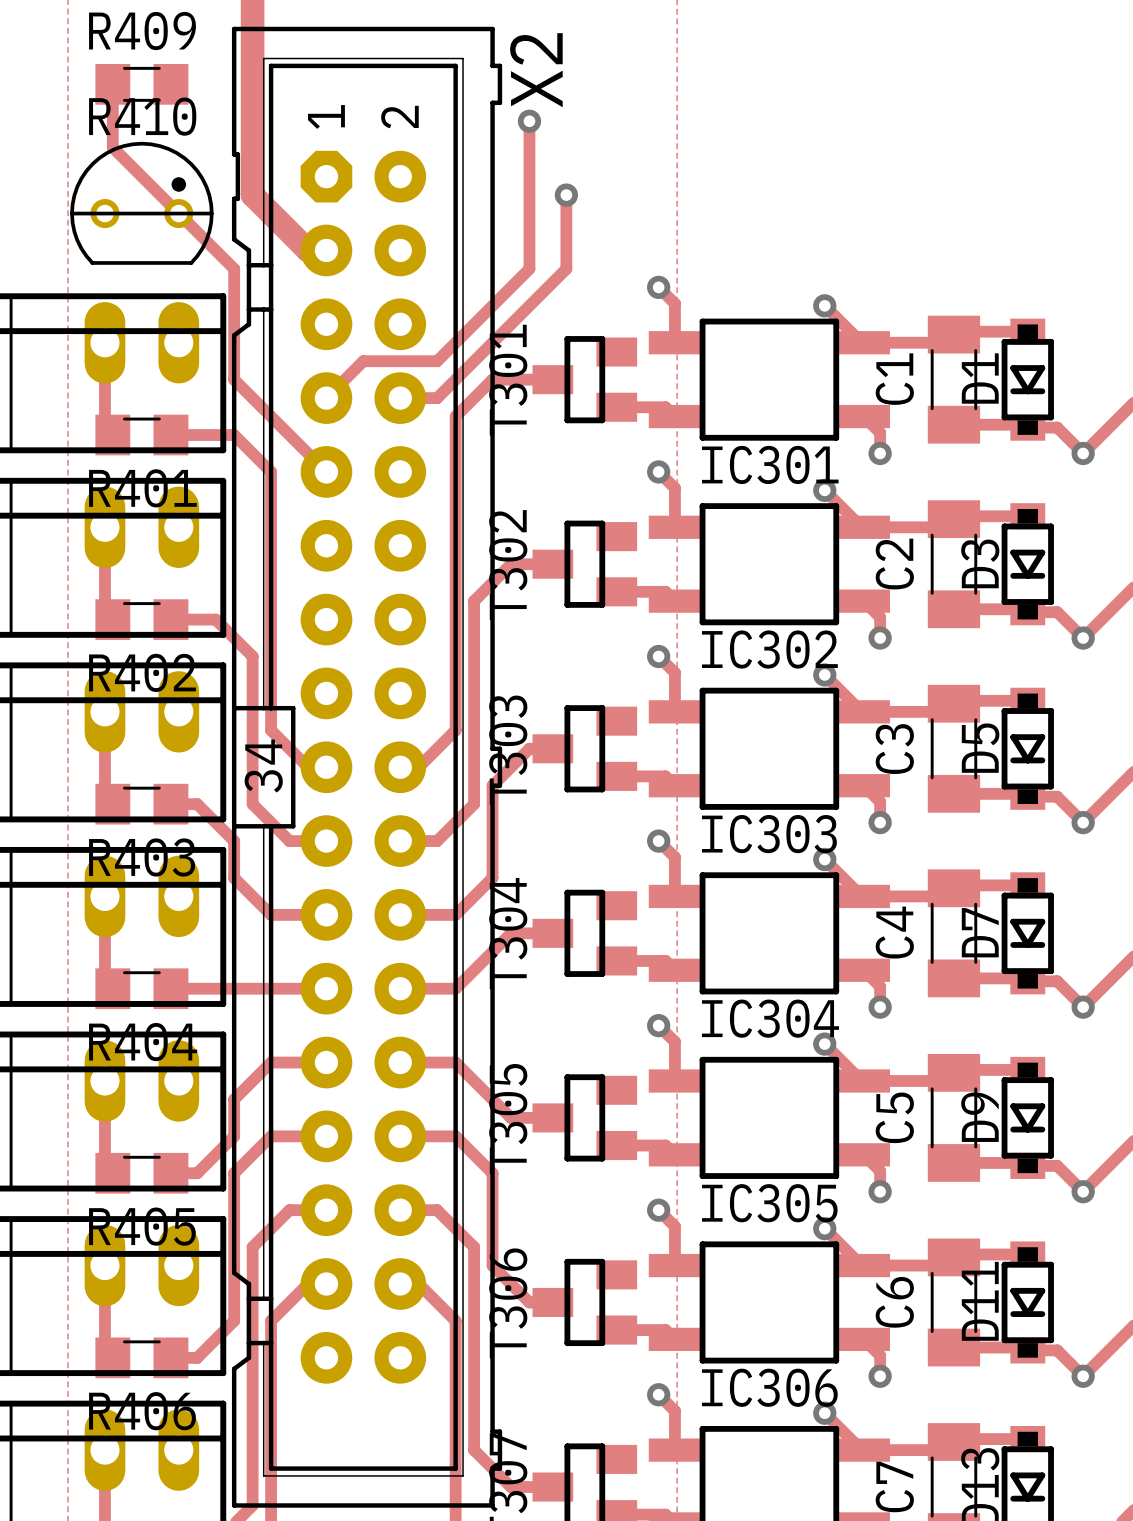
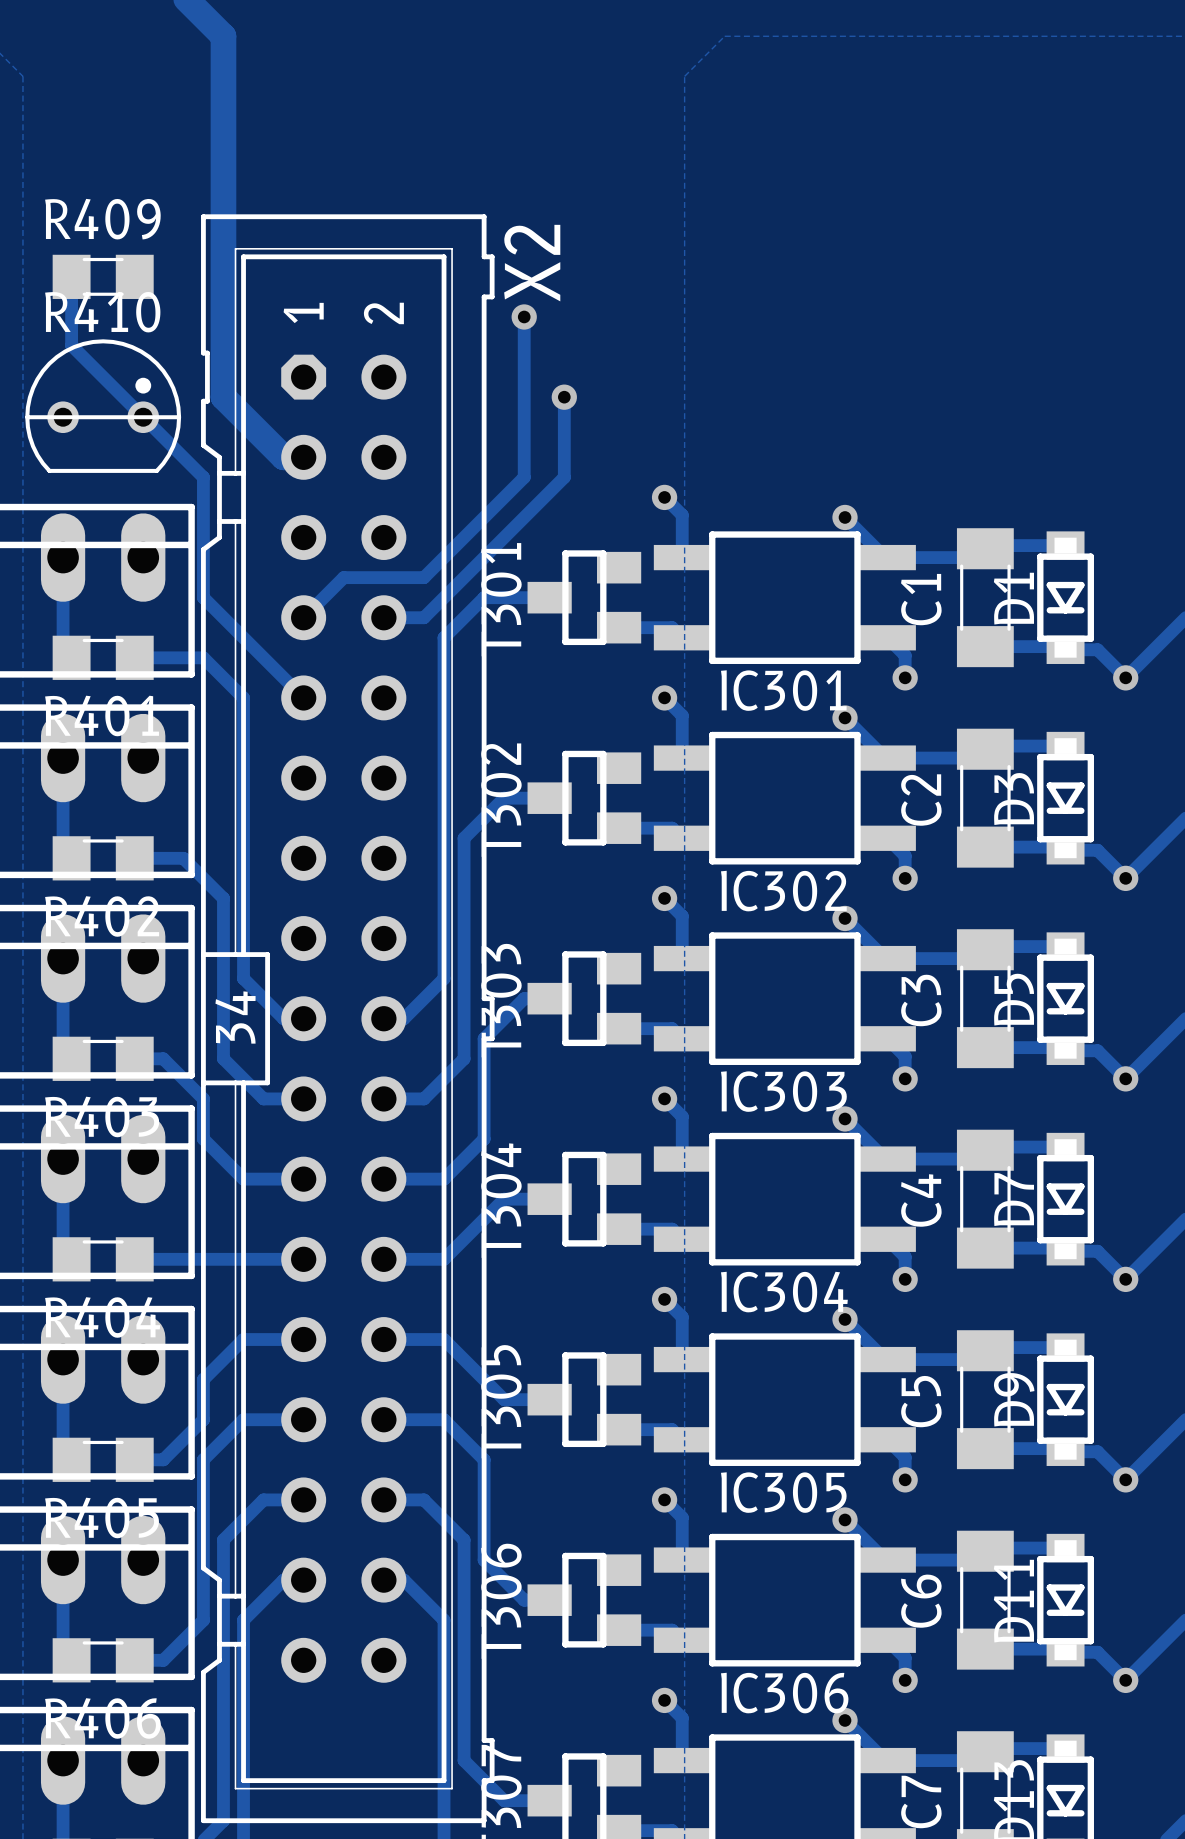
X2 footprint: [231, 26, 503, 1508] -> [201, 214, 495, 1824]

